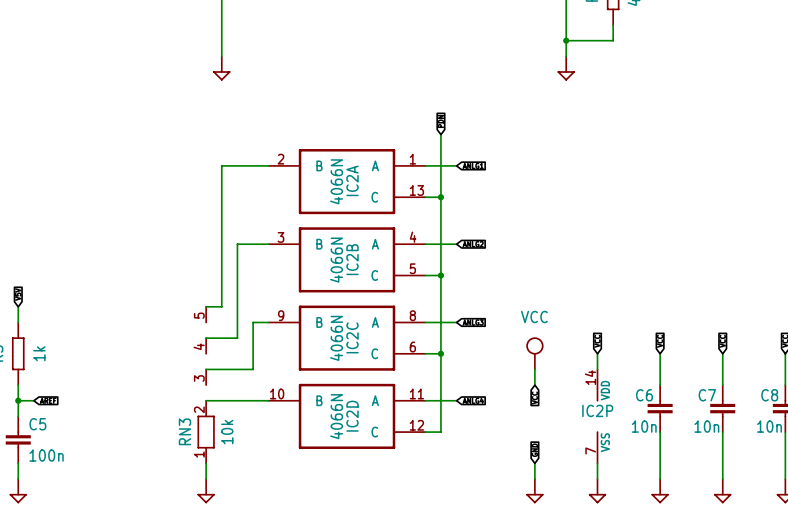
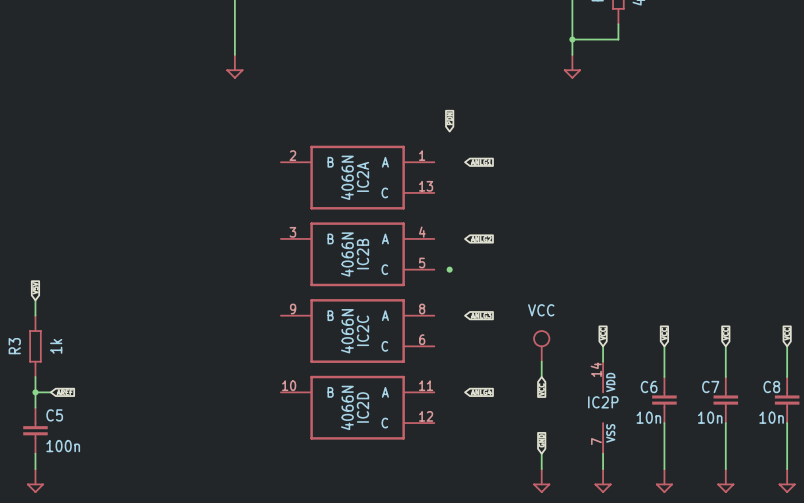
wire: (440, 134) (440, 432) (425, 432) -> none
wire: (268, 165) (221, 165) (221, 306) (206, 306) -> none
wire: (425, 165) (456, 165) -> none
wire: (425, 197) (440, 197) -> none
junction: (440, 197) -> none
wire: (268, 244) (237, 244) (237, 338) (206, 338) -> none
wire: (425, 244) (456, 244) -> none
wire: (425, 275) (440, 275) -> none
wire: (268, 322) (253, 322) (253, 369) (206, 369) -> none
wire: (425, 322) (456, 322) -> none
wire: (425, 353) (440, 353) -> none
junction: (440, 353) -> none
RN3: 10k (206, 385) -> none
wire: (206, 400) (268, 400) -> none
wire: (425, 400) (456, 400) -> none
wire: (206, 463) (206, 479) -> none
power symbol: (206, 491) -> none

